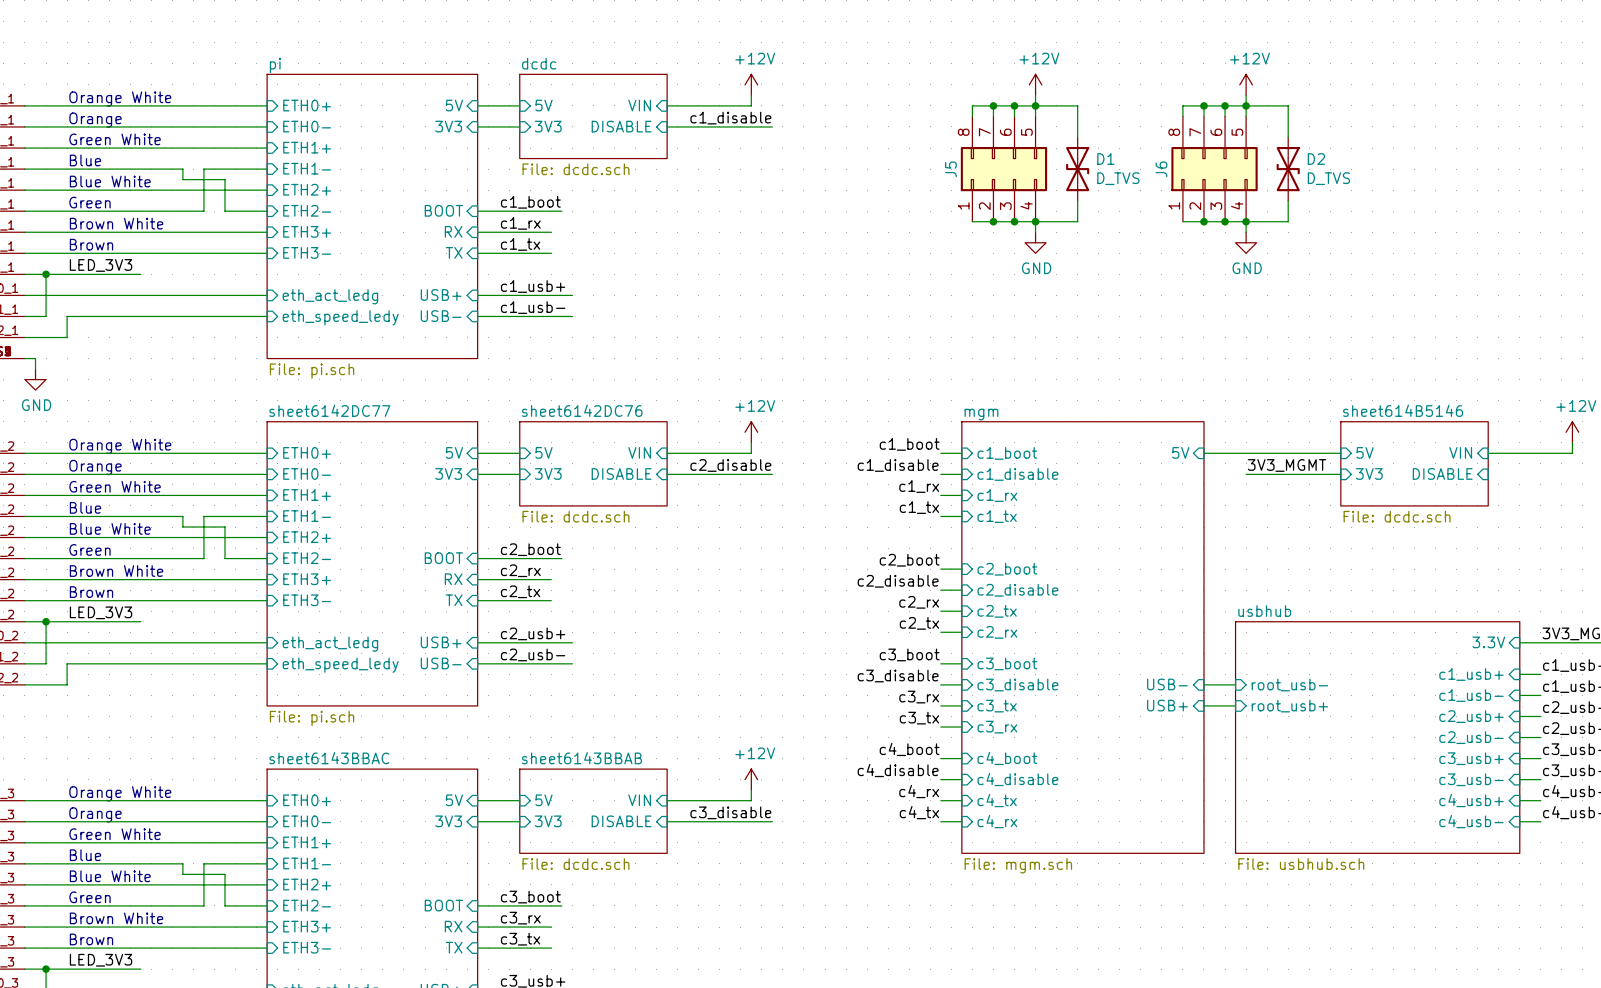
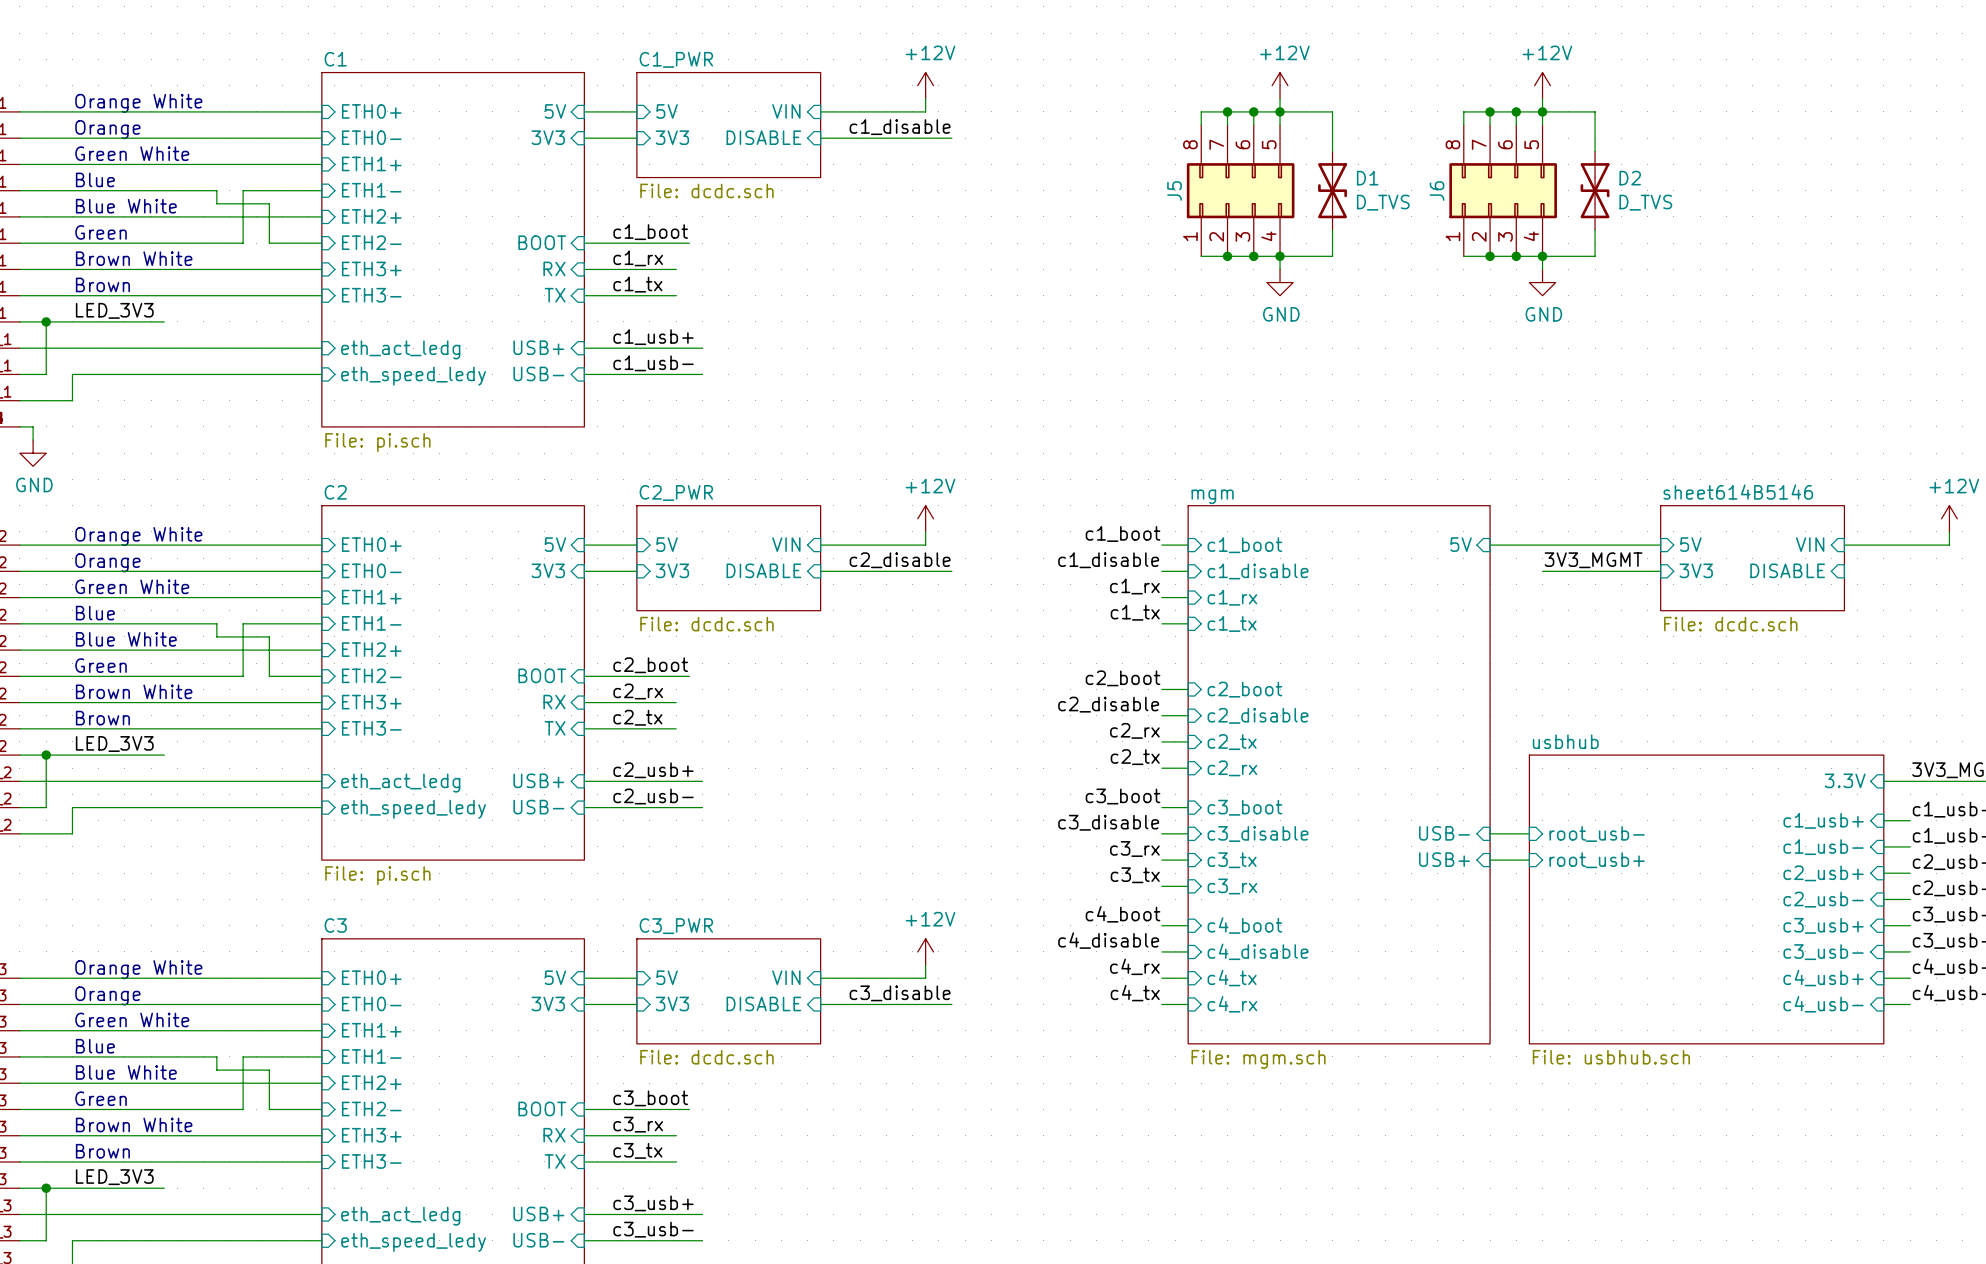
sheet dcdc name: dcdc (539, 63) -> C1_PWR (676, 59)
sheet pi name: pi (275, 65) -> C1 (335, 59)
sheet sheet6142DC77 name: sheet6142DC77 (329, 410) -> C2 (335, 492)
sheet sheet6142DC76 name: sheet6142DC76 (582, 410) -> C2_PWR (676, 492)
sheet sheet6143BBAC name: sheet6143BBAC (329, 758) -> C3 (335, 925)
sheet sheet6143BBAB name: sheet6143BBAB (581, 758) -> C3_PWR (676, 926)

